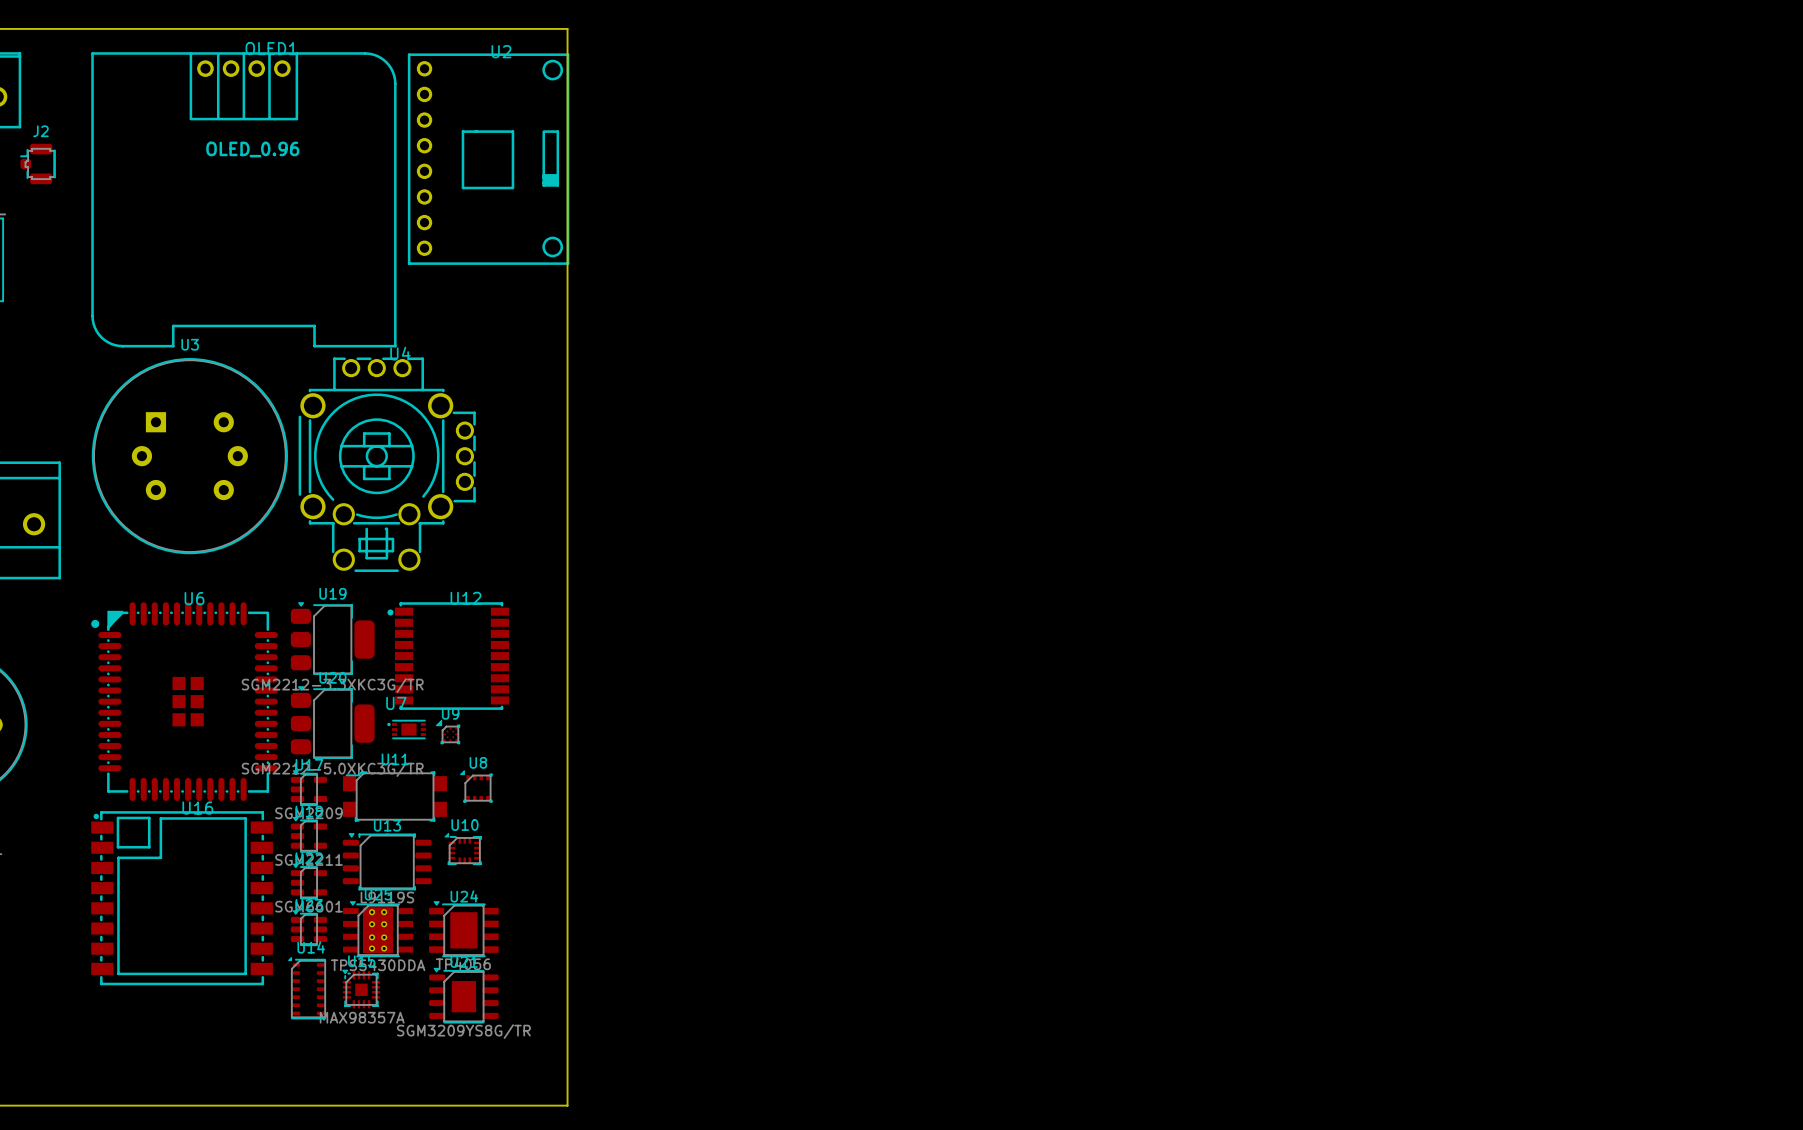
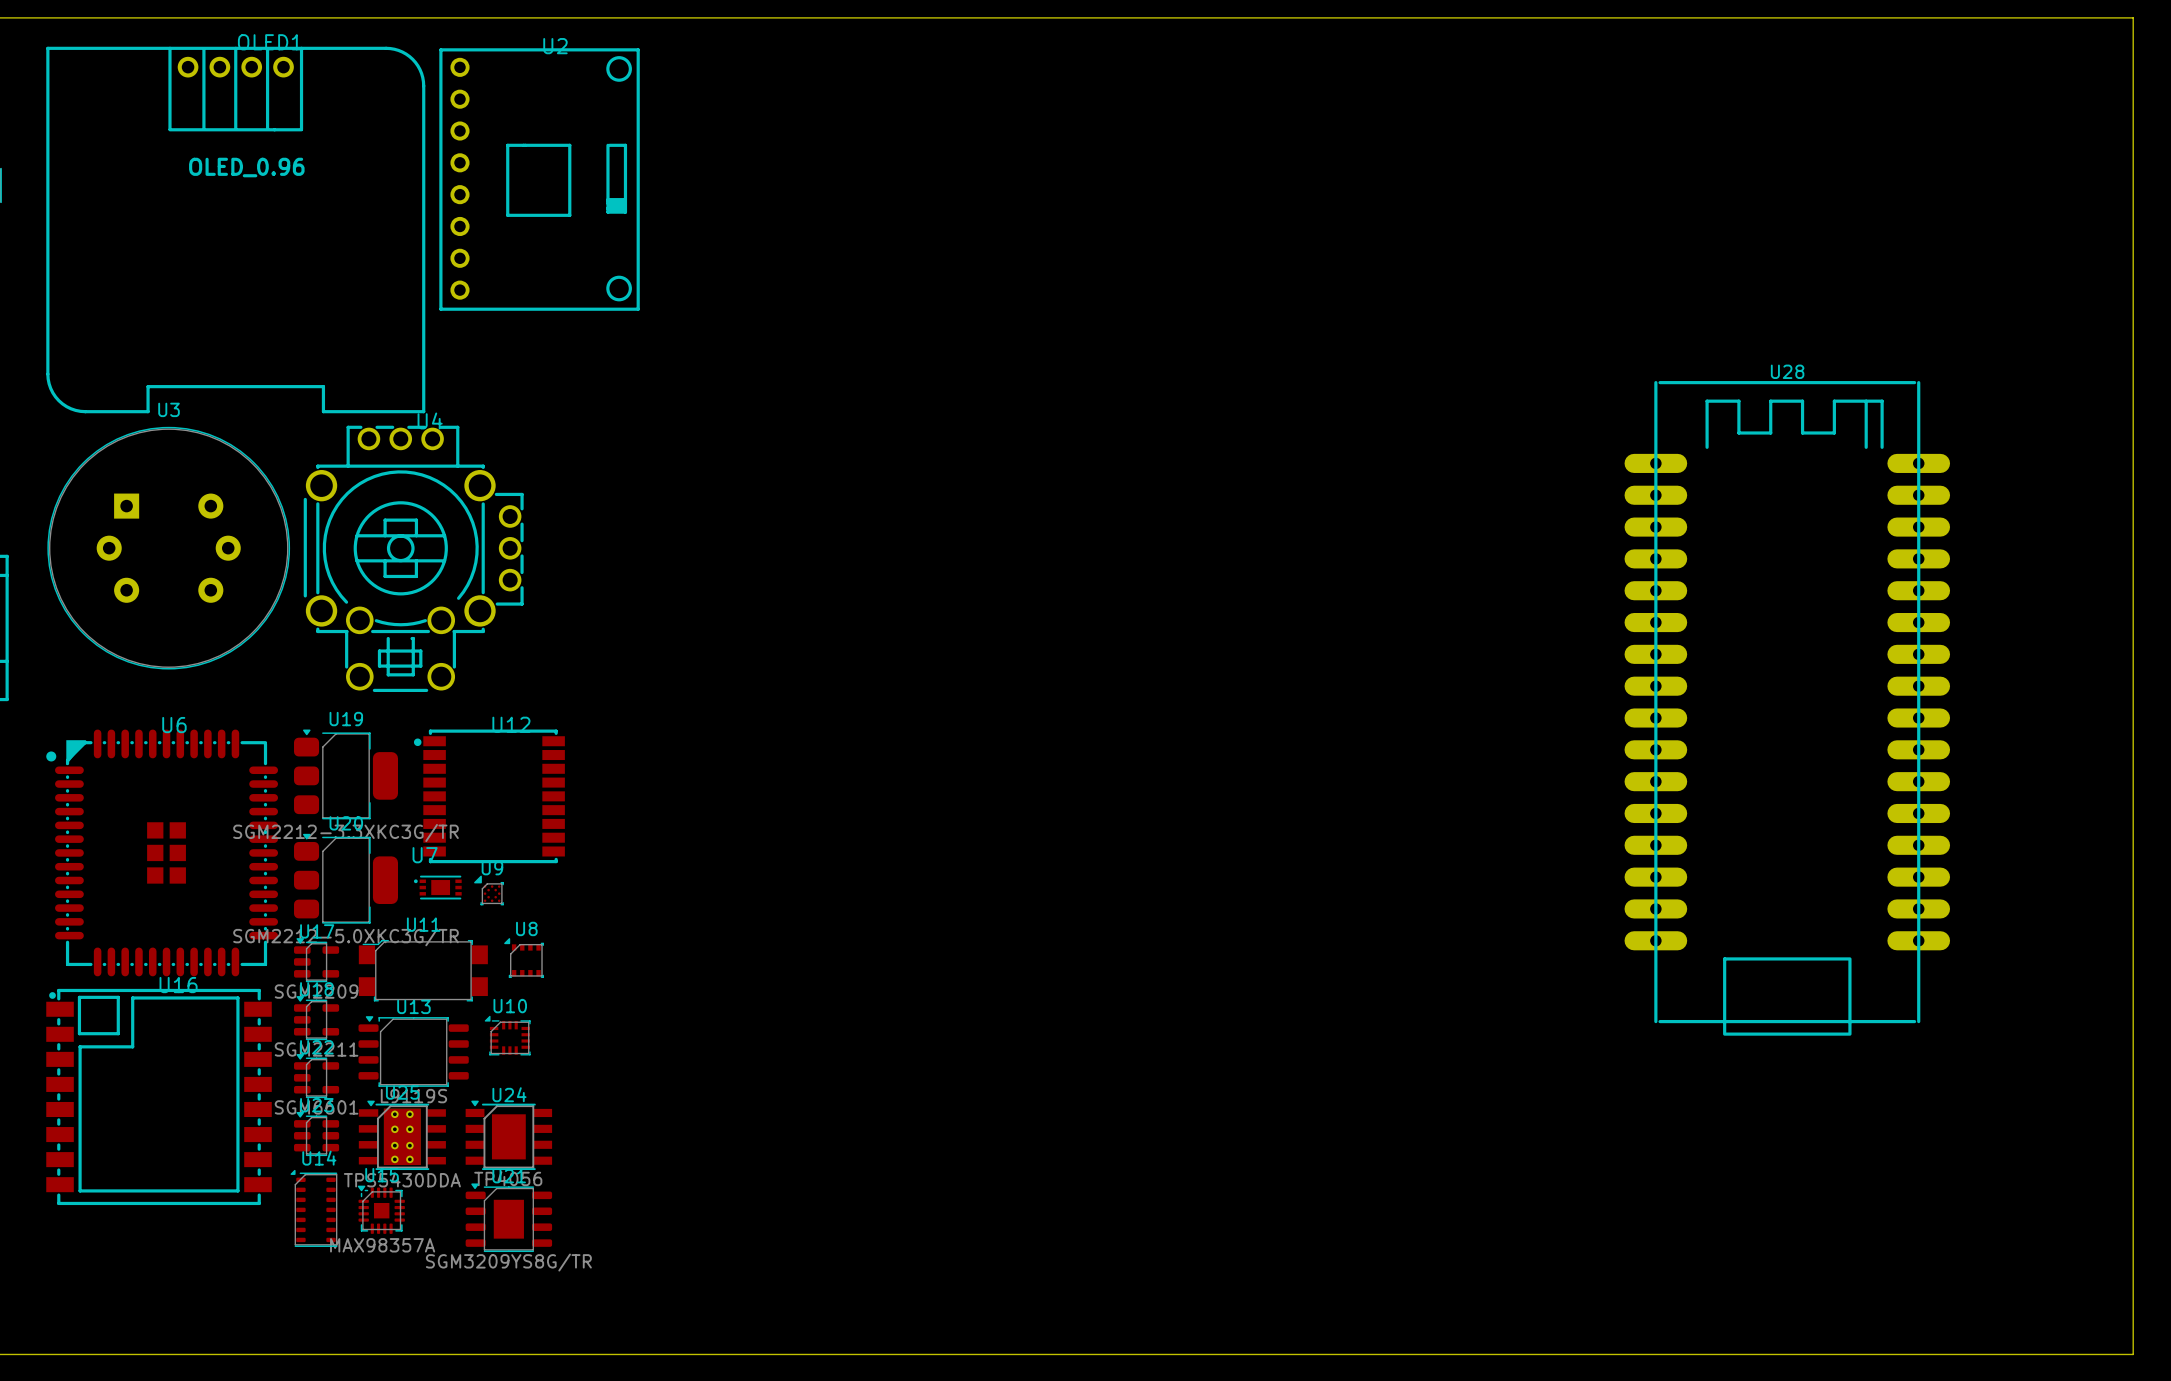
board edge: (567, 28) (567, 1105) -> (637, 17) (2133, 17) (2133, 1354) (637, 1354)
U28: none -> (1787, 708)

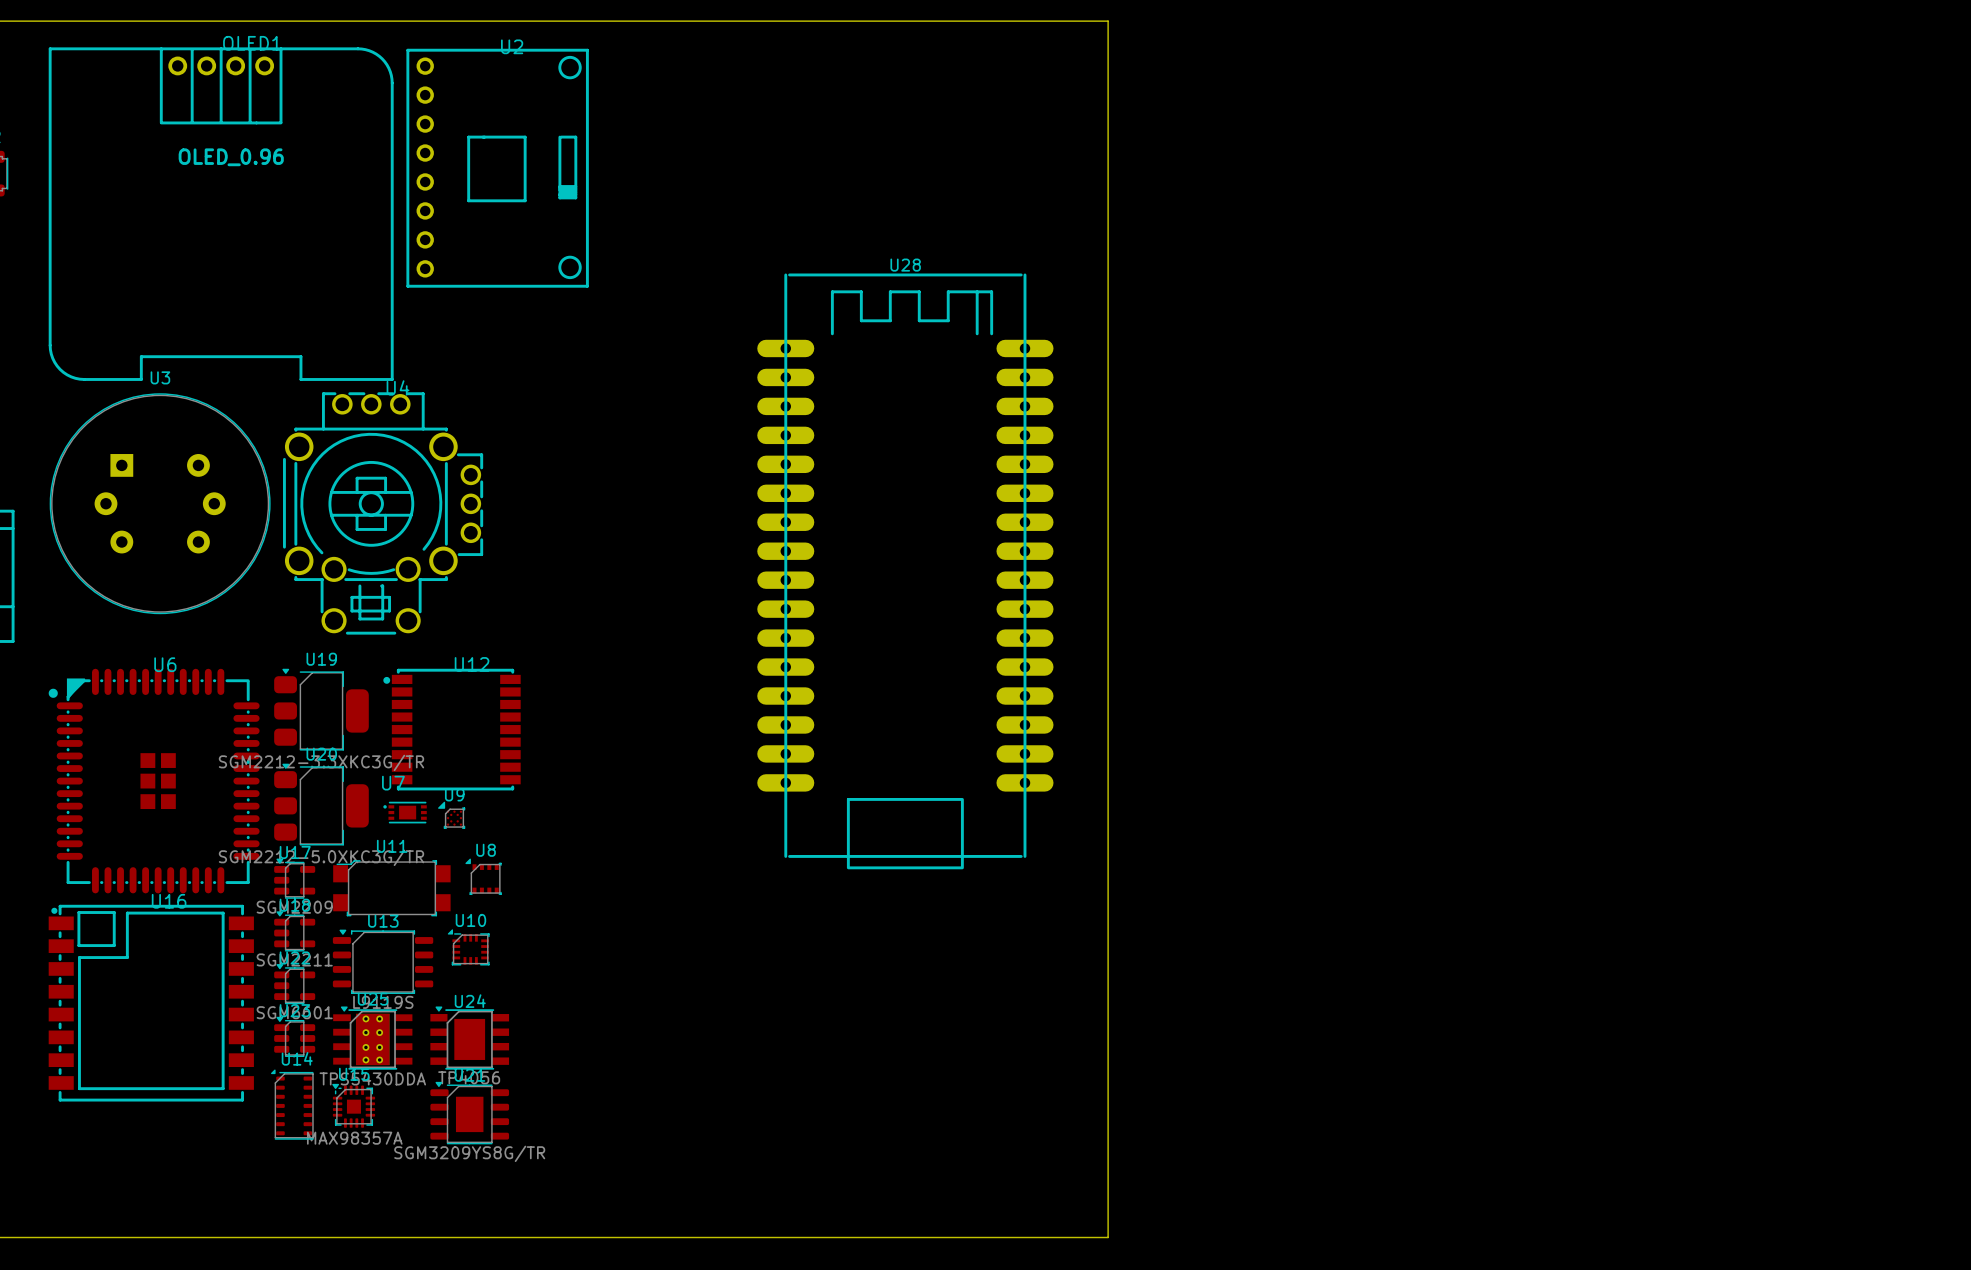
board edge: (1210, 17) (2133, 17) (2133, 1354) (1210, 1354) -> (1108, 21) (1108, 1237)
U28 position: (1787, 708) -> (905, 571)

